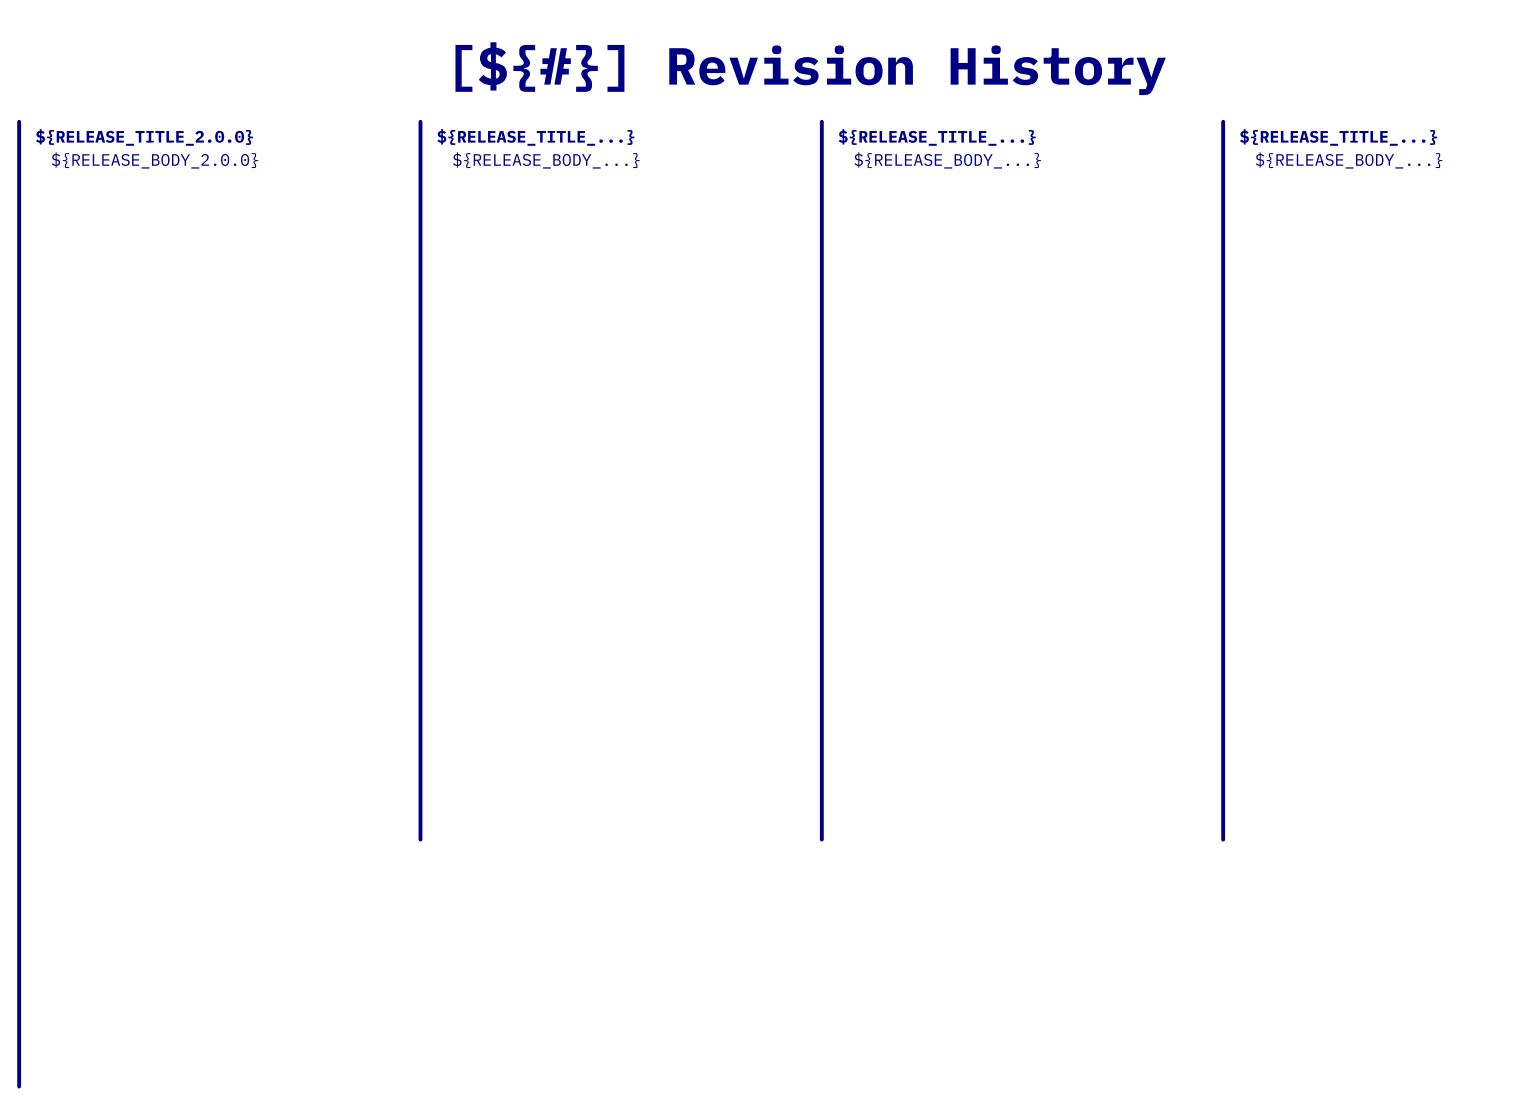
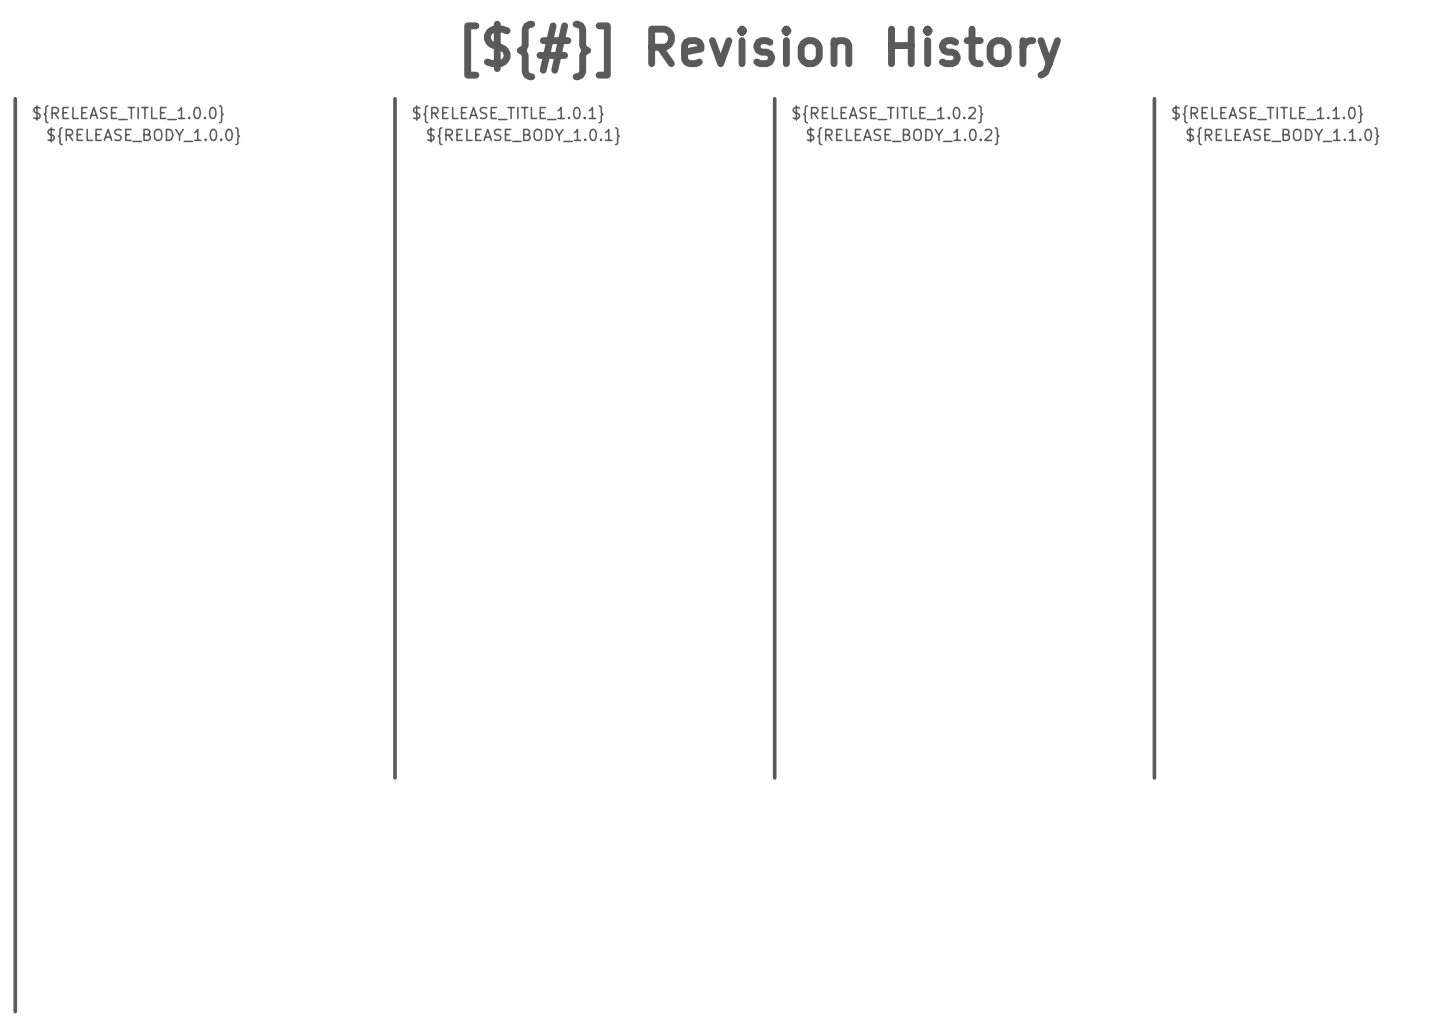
text: ${RELEASE_TITLE_2.0.0} (144, 137) -> ${RELEASE_TITLE_1.0.0} (128, 114)
text: ${RELEASE_TITLE_...} (535, 137) -> ${RELEASE_TITLE_1.0.1} (508, 114)
text: ${RELEASE_TITLE_...} (937, 137) -> ${RELEASE_TITLE_1.0.2} (887, 114)
text: ${RELEASE_TITLE_...} (1338, 137) -> ${RELEASE_TITLE_1.1.0} (1267, 114)
text: ${RELEASE_BODY_2.0.0} (155, 160) -> ${RELEASE_BODY_1.0.0} (143, 136)
text: ${RELEASE_BODY_...} (546, 160) -> ${RELEASE_BODY_1.0.1} (523, 136)
text: ${RELEASE_BODY_...} (947, 160) -> ${RELEASE_BODY_1.0.2} (903, 136)
text: ${RELEASE_BODY_...} (1349, 160) -> ${RELEASE_BODY_1.1.0} (1282, 136)

